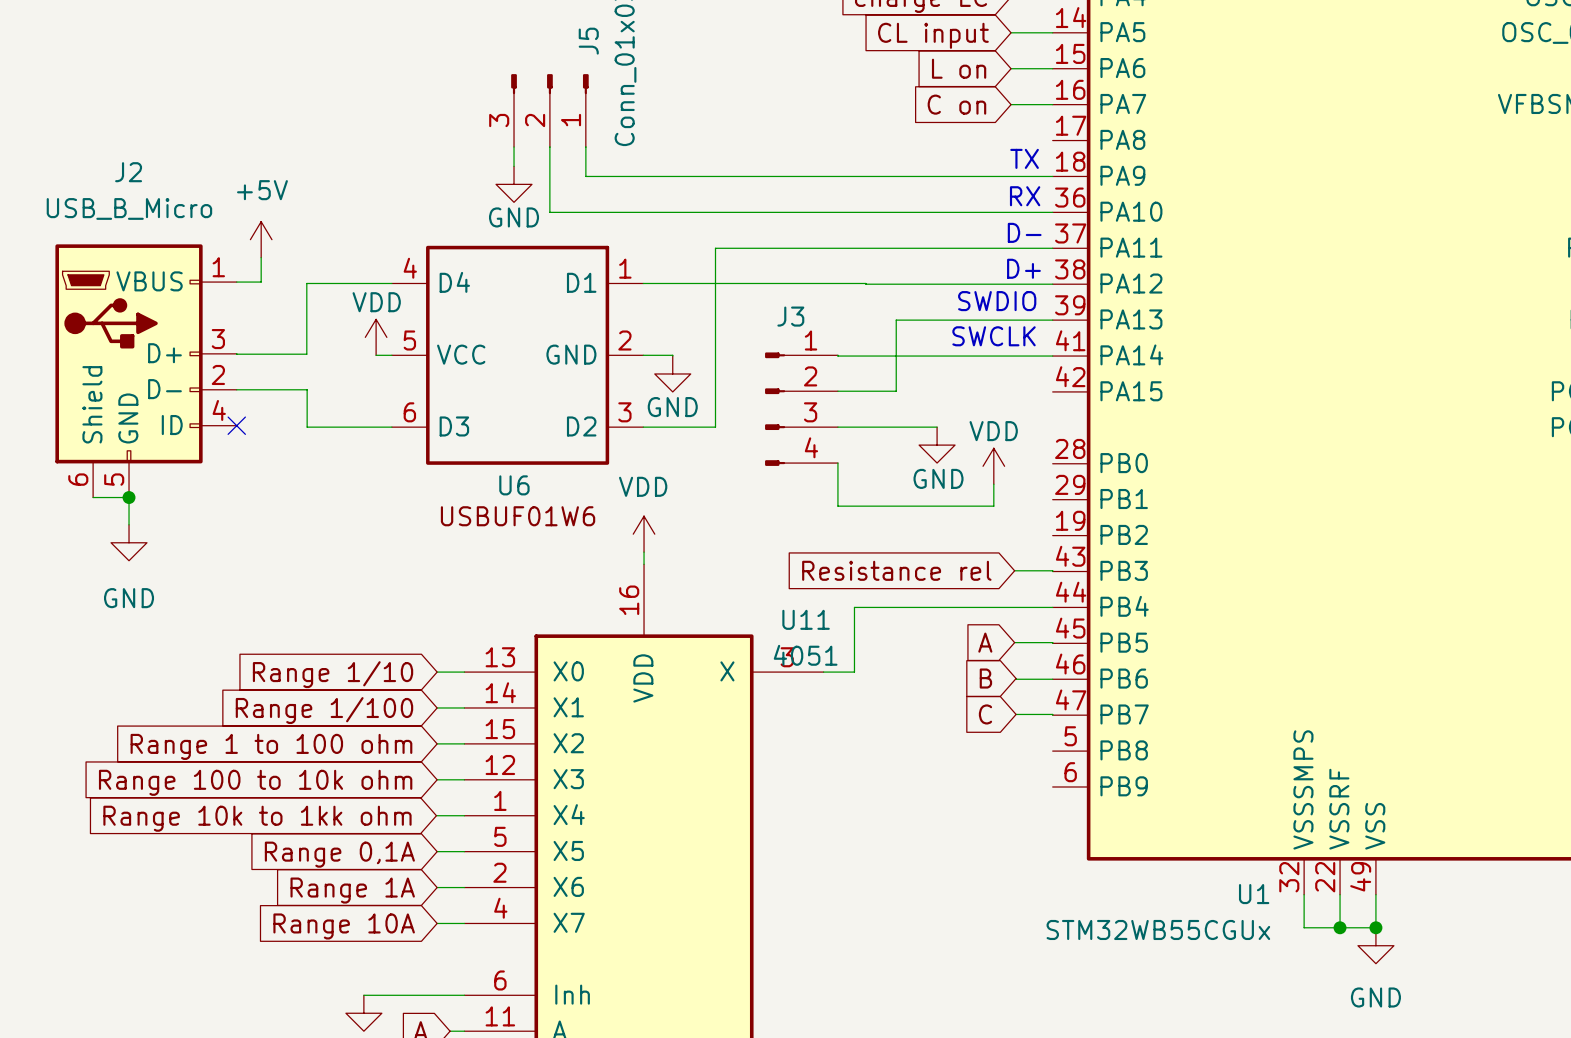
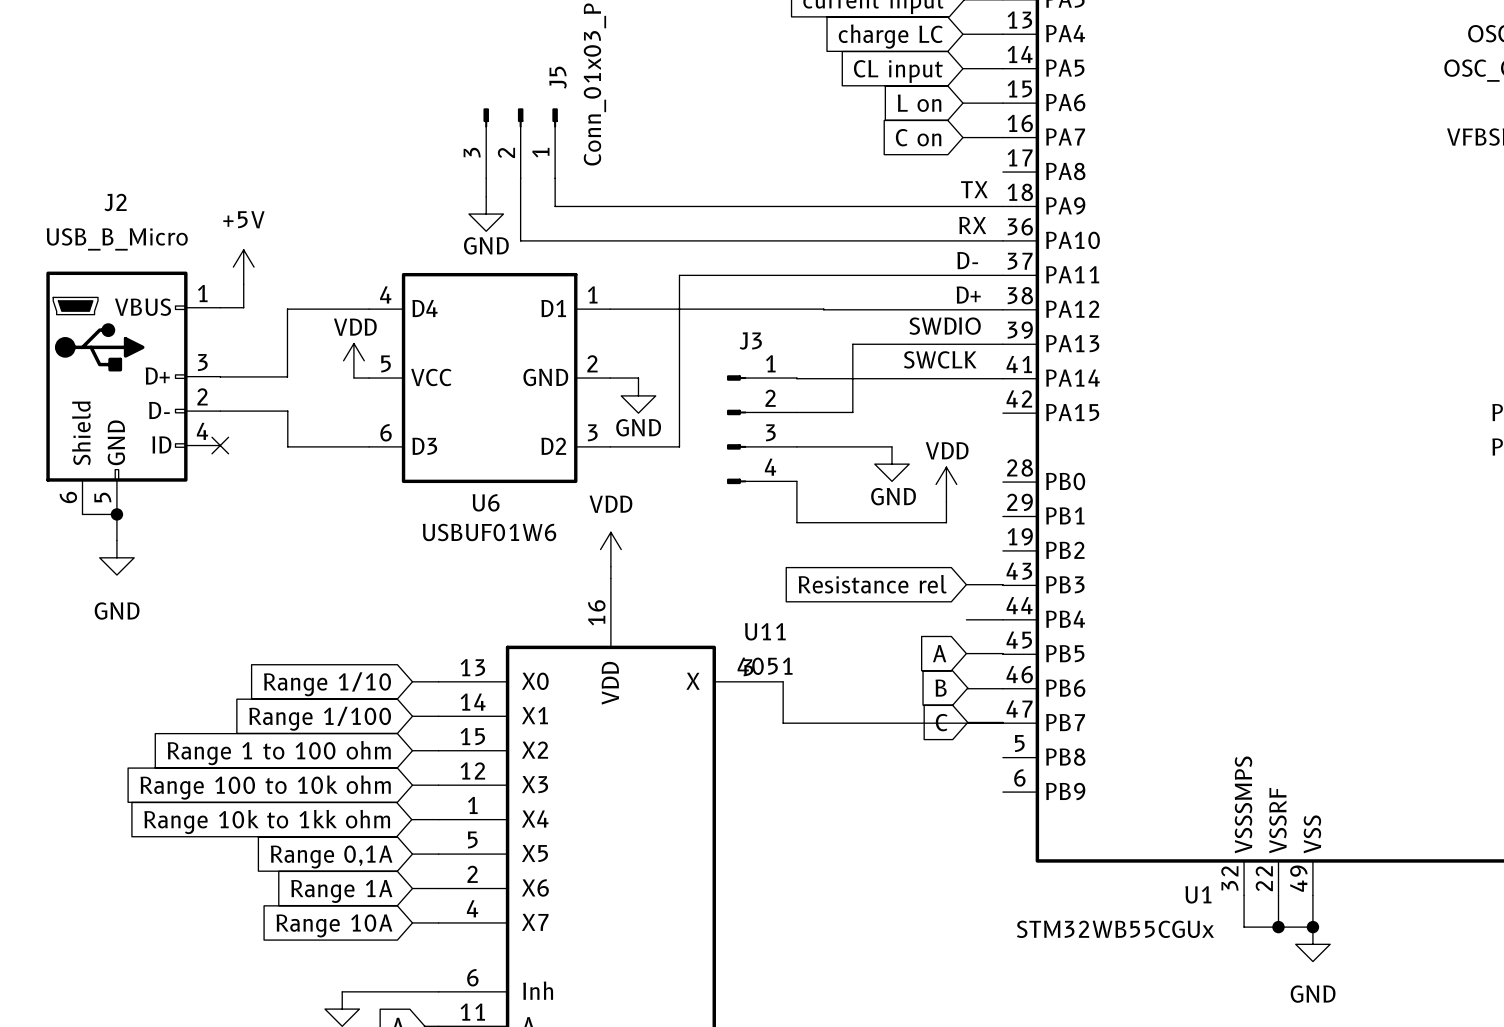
wire: (1014, 607) (854, 607) (854, 672) (823, 672) -> (1002, 723) (783, 723) (783, 681)

